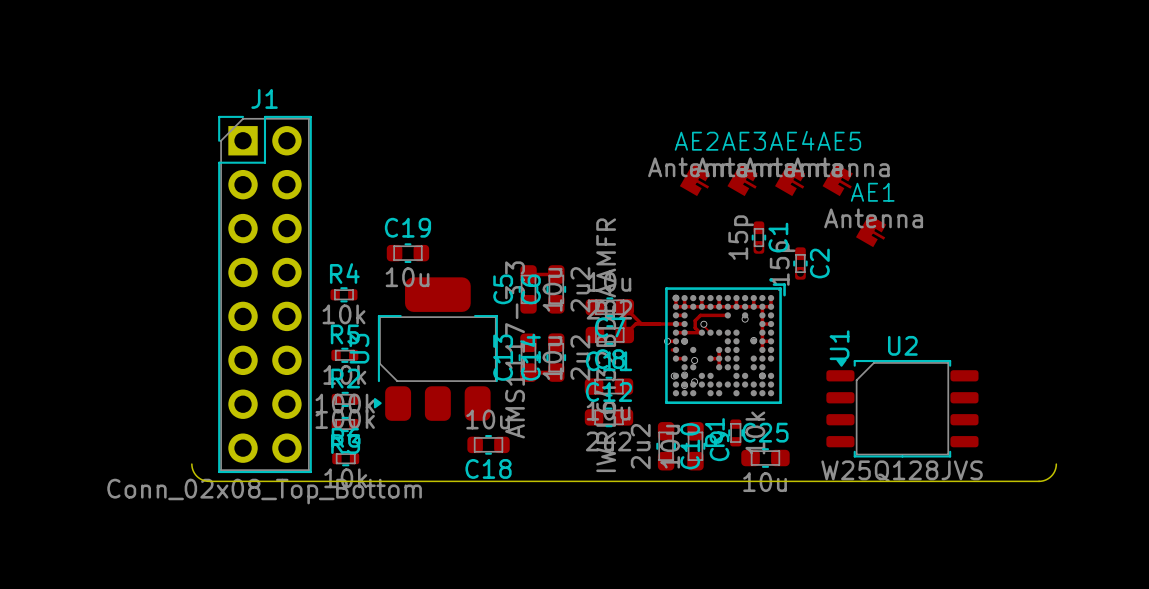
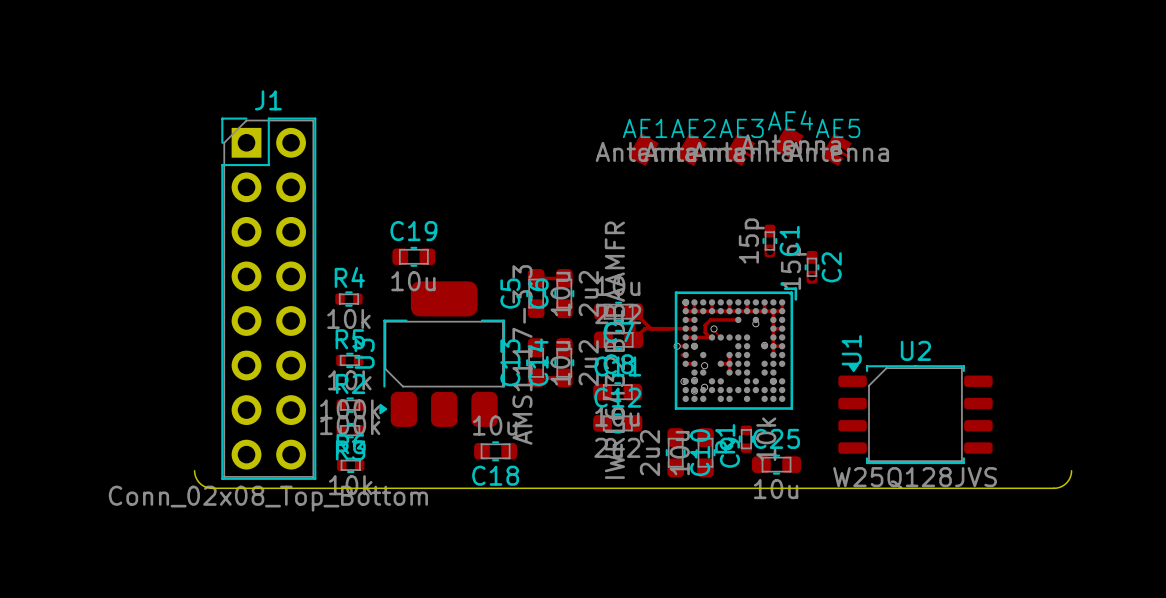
AE2 footprint: [679, 163, 711, 197] -> [676, 133, 708, 167]
AE3 footprint: [727, 163, 758, 197] -> [724, 133, 756, 167]
AE4 footprint: [775, 163, 806, 197] -> [773, 125, 804, 159]
AE5 footprint: [822, 163, 853, 197] -> [821, 133, 852, 167]
AE1 footprint: [855, 214, 887, 248] -> [628, 133, 659, 167]

